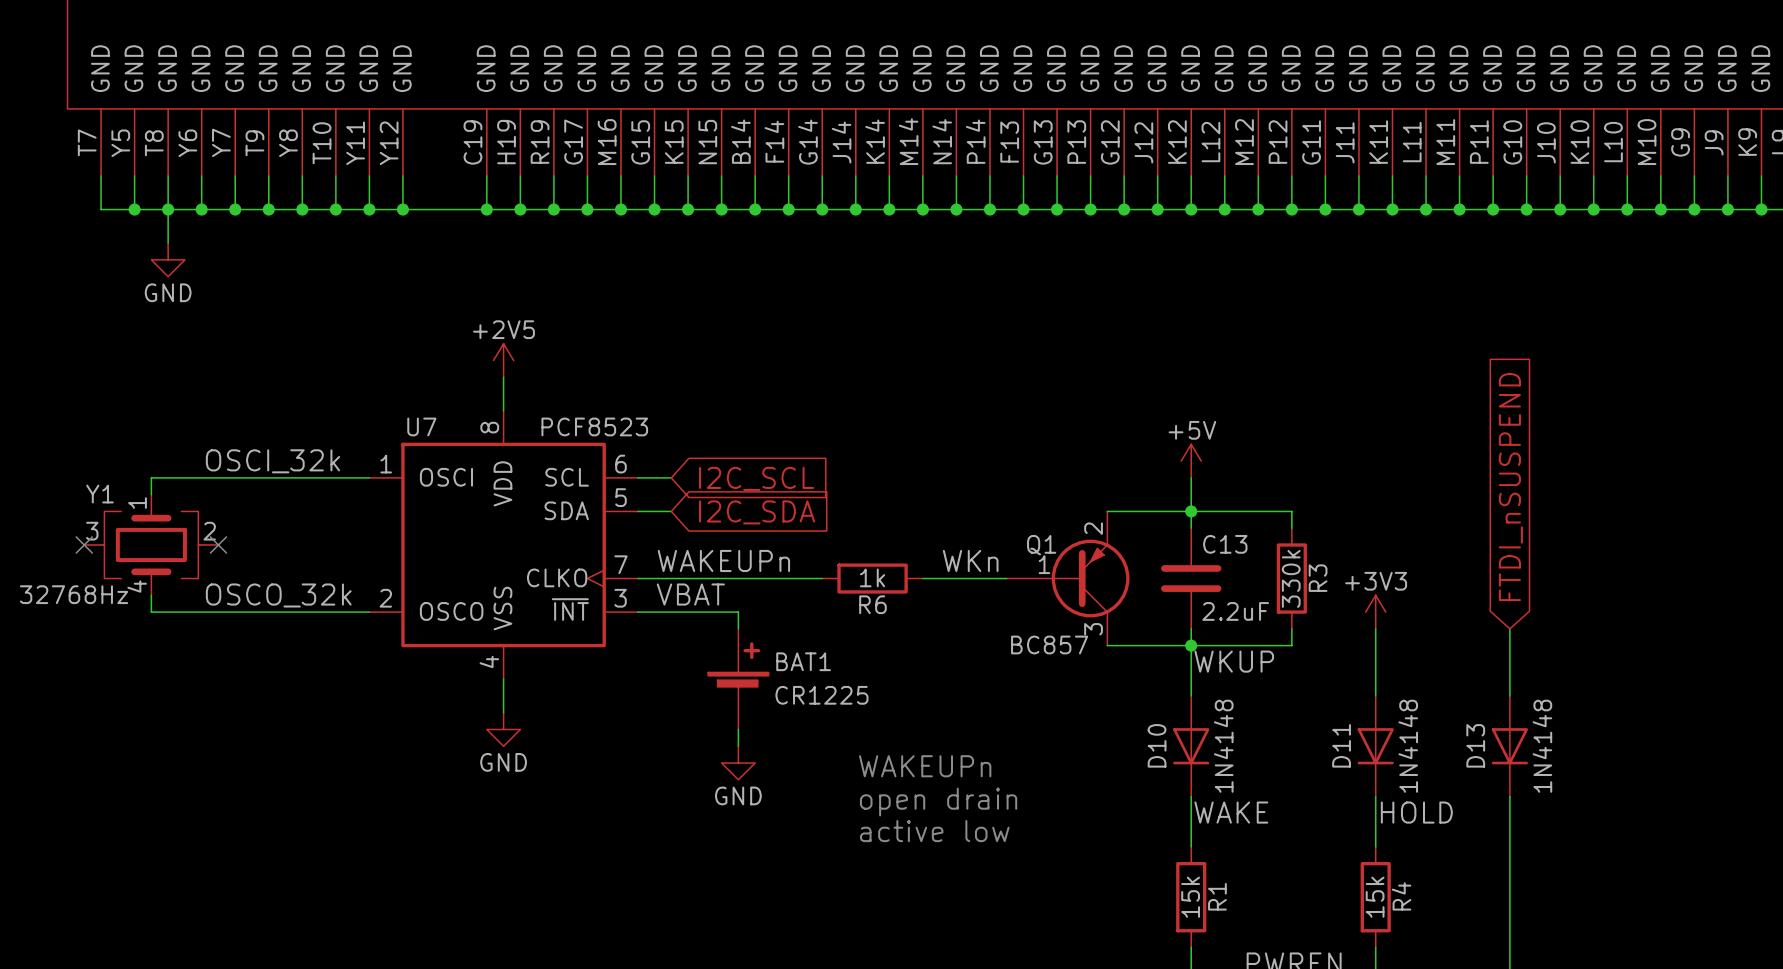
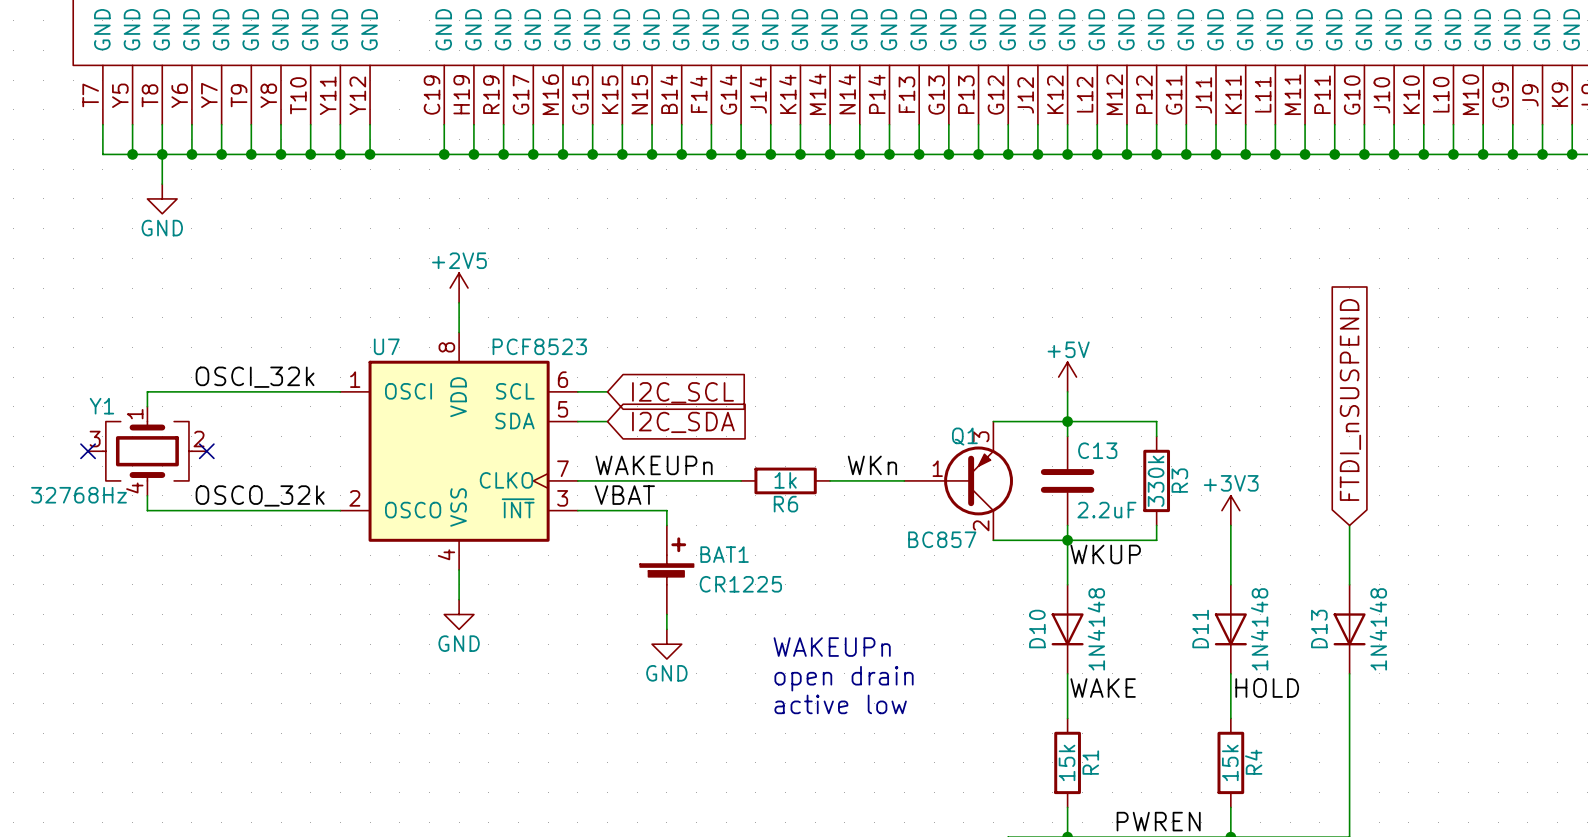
Q1 pin number: 2 (1093, 528) -> 3 (981, 436)
Q1 name position: Q1 (1041, 545) -> Q1 (964, 436)
Q1 pin number: 3 (1093, 629) -> 2 (981, 525)

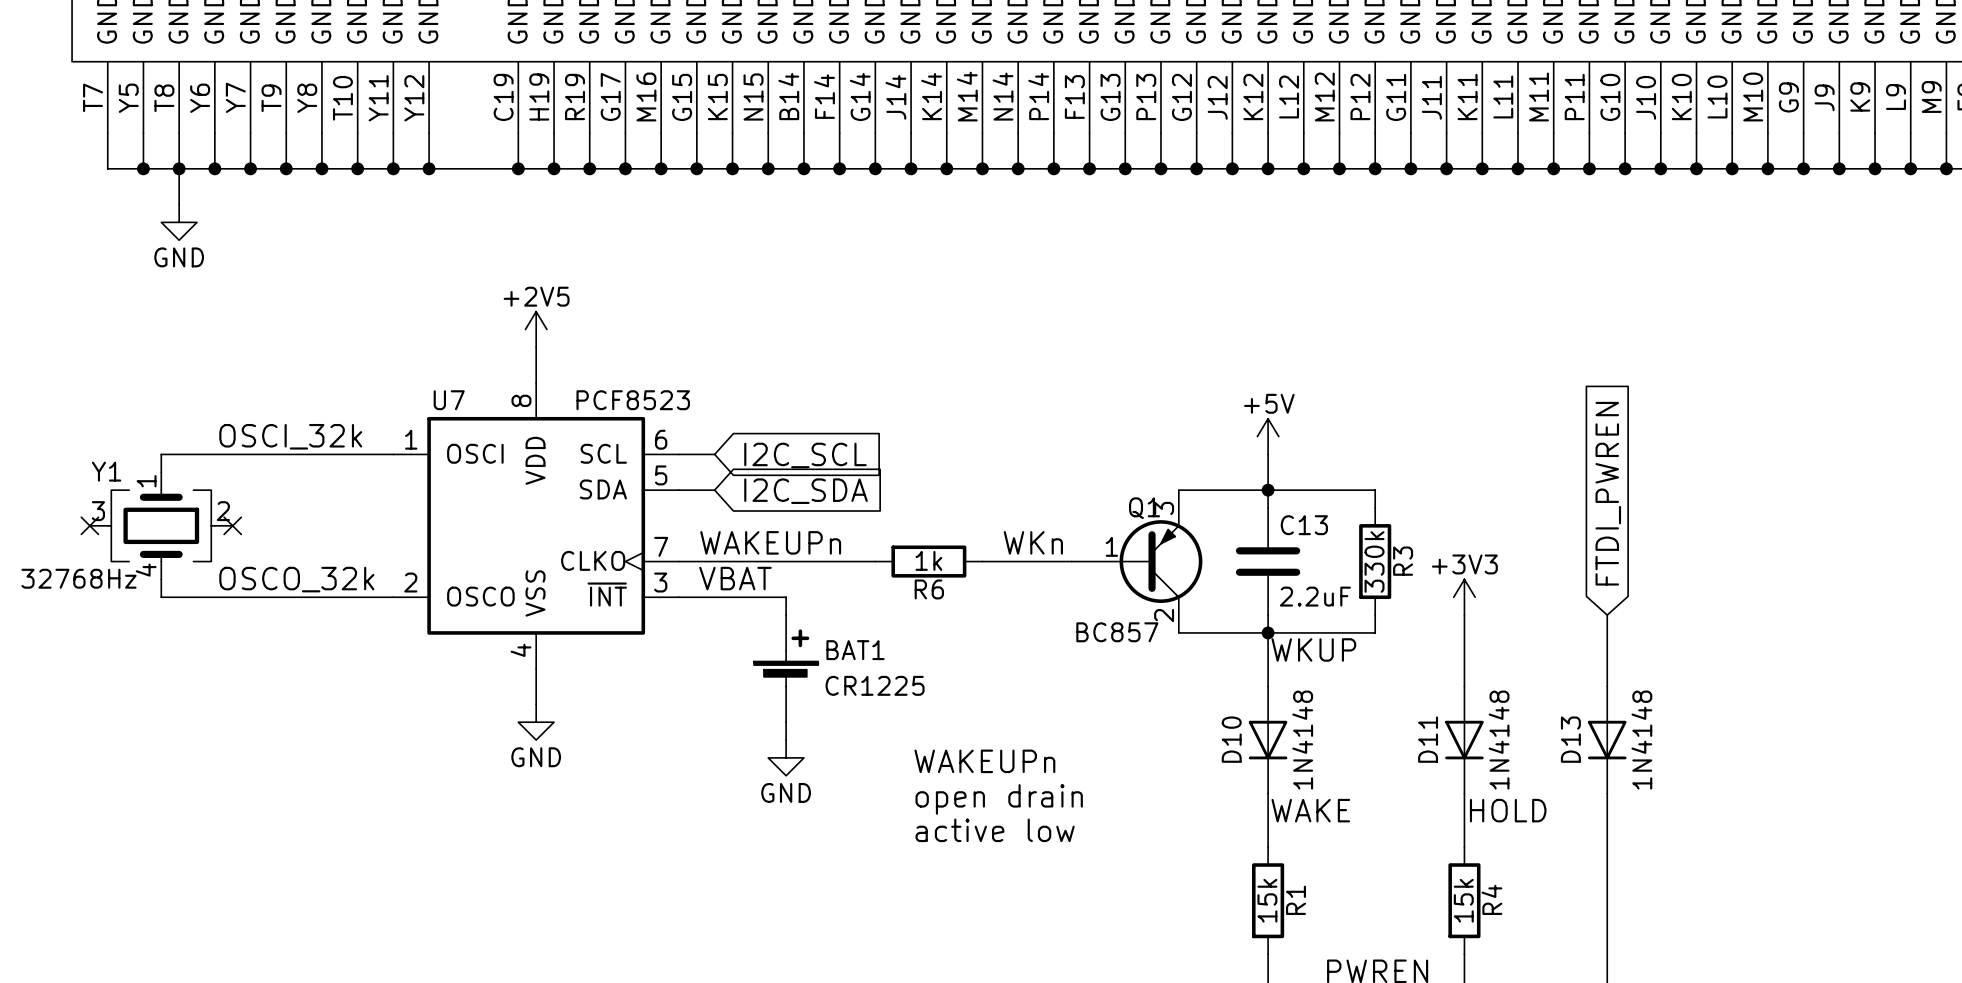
global label: FTDI_nSUSPEND (1350, 399) -> FTDI_PWREN (1608, 493)

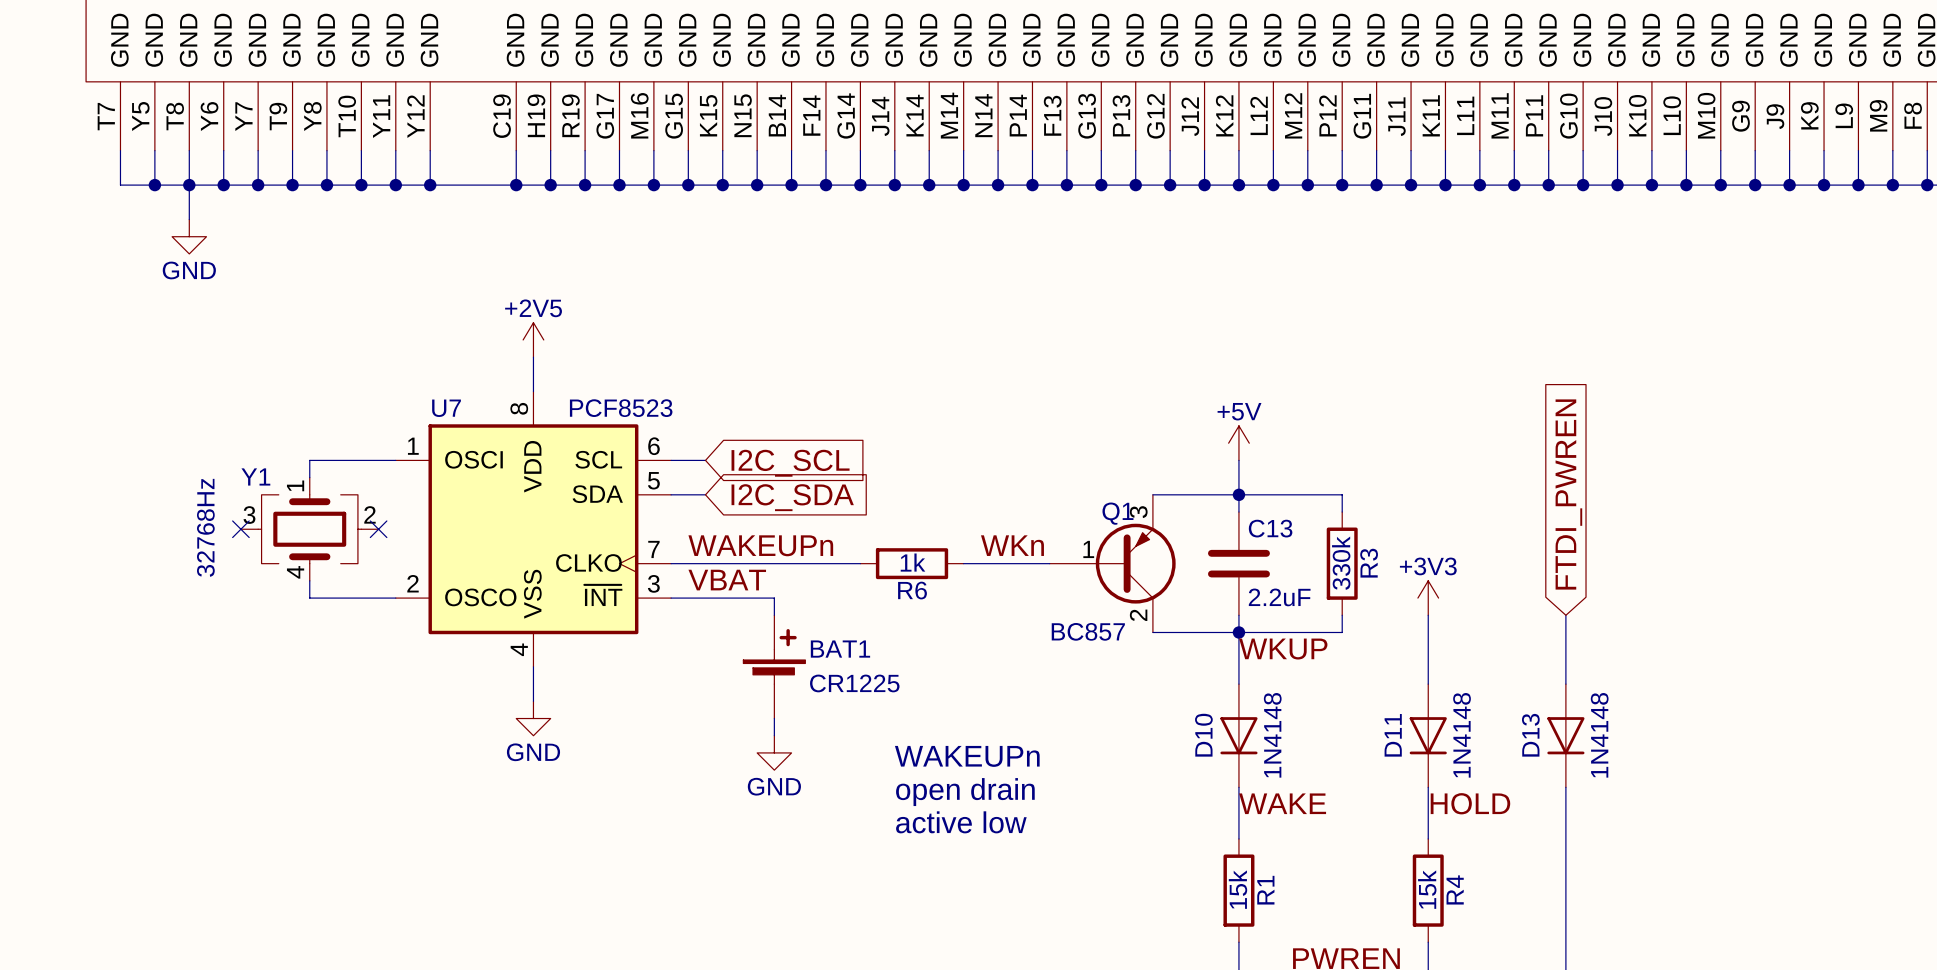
label: OSCI_32k (290, 436) -> none
wire: (304, 454) (161, 454) (161, 472) -> (309, 460) (309, 477)
no-connect mark: (89, 525) -> none
Y1 position: (161, 525) -> (309, 529)
no-connect mark: none -> (378, 529)
Y1 value rotation: 0° (78, 578) -> 90° counterclockwise (205, 527)
wire: (161, 579) (161, 597) (304, 597) -> (309, 580) (309, 598)
label: OSCO_32k (296, 579) -> none

